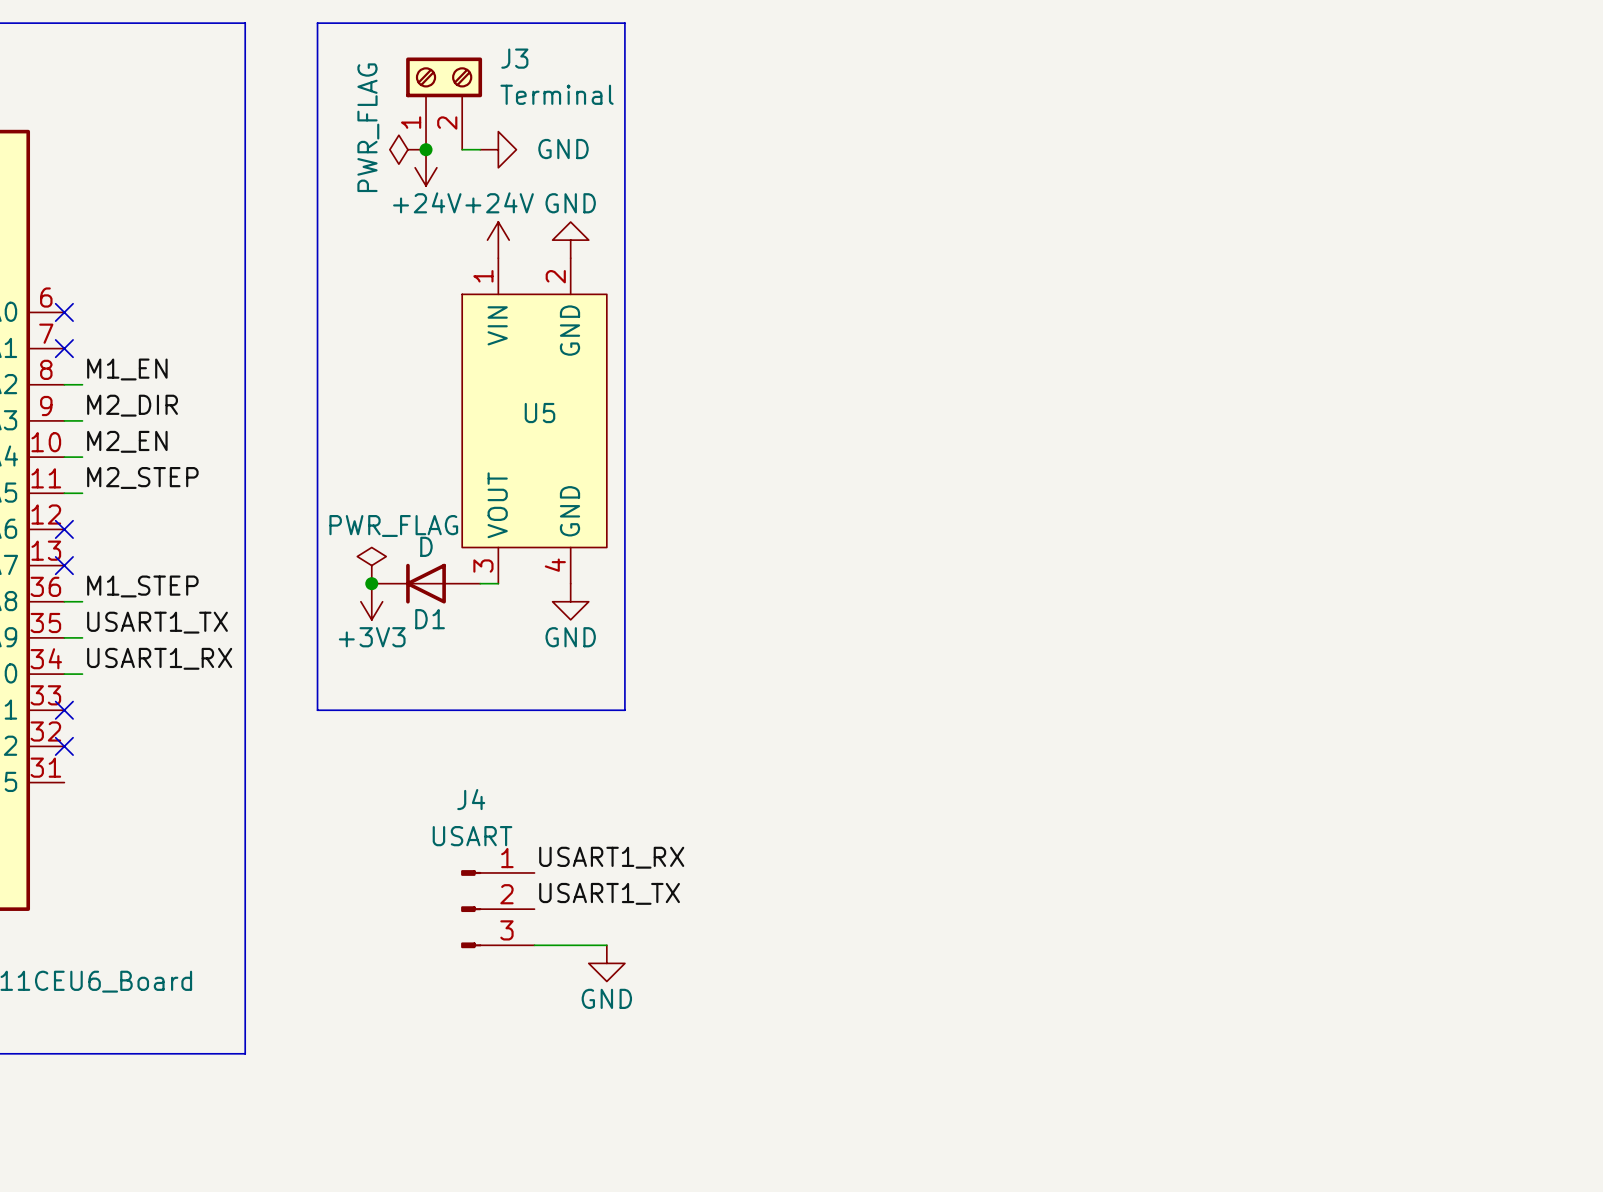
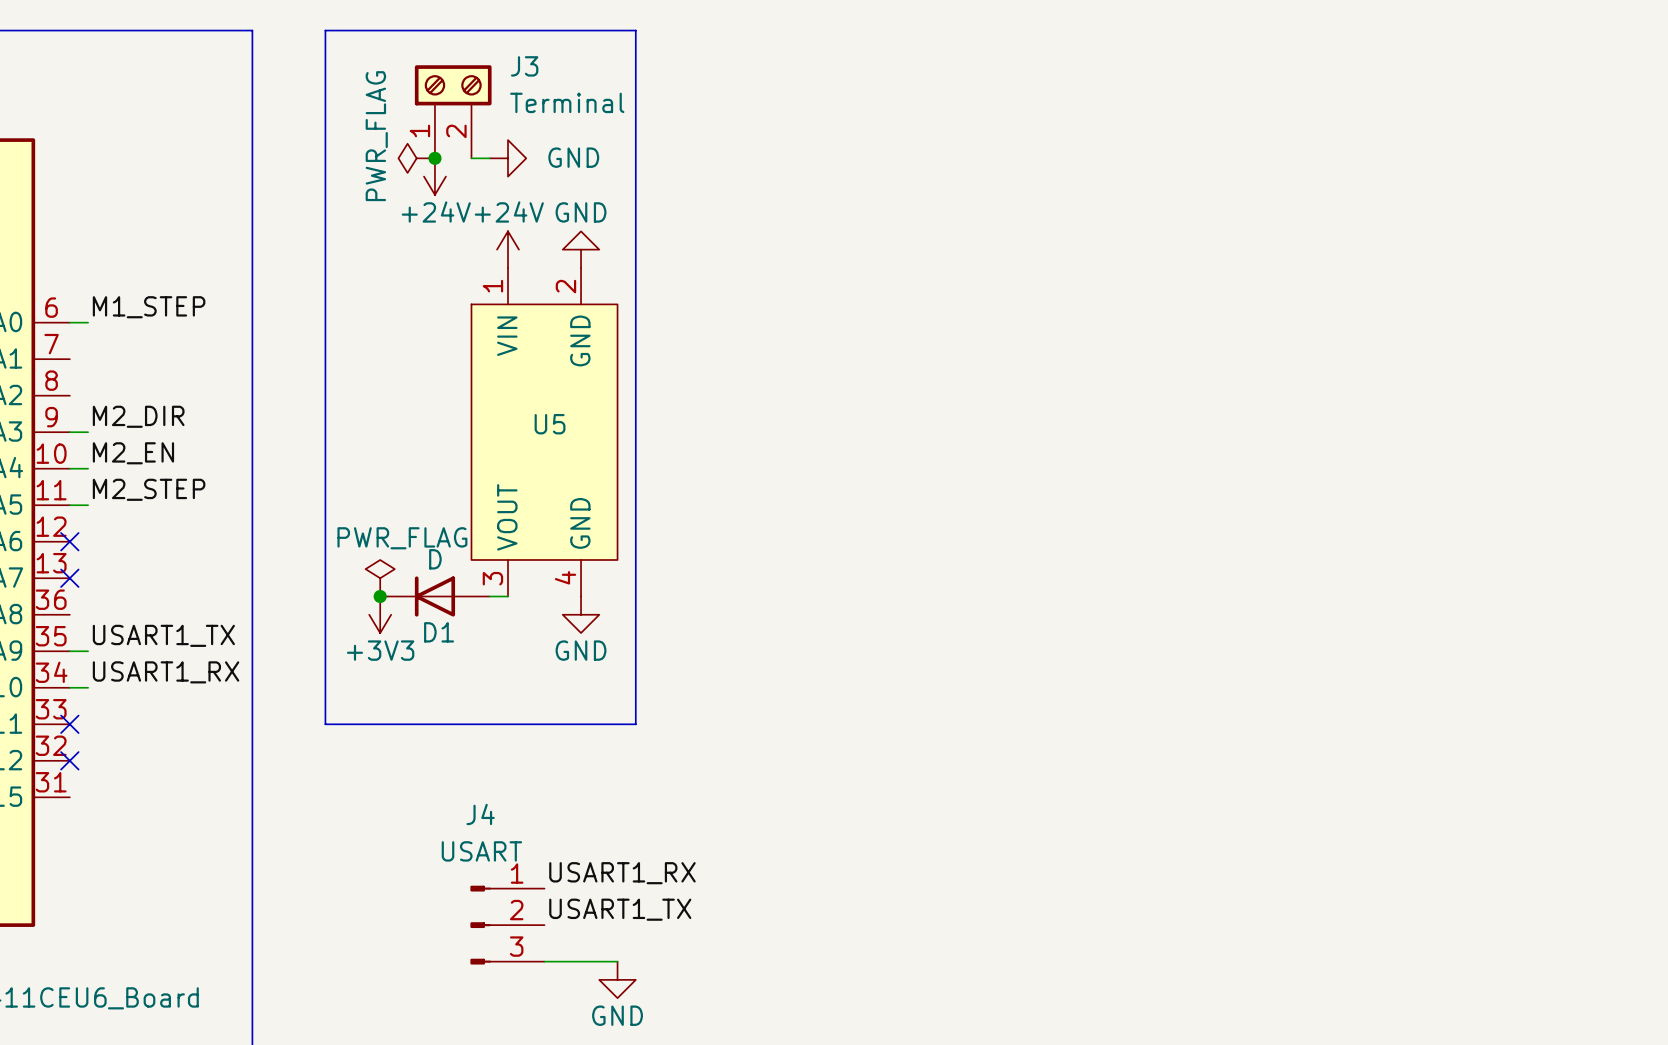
no-connect mark: (64, 312) -> none
no-connect mark: (64, 348) -> none
label: M1_EN (127, 369) -> none
wire: (64, 384) (82, 384) -> (69, 322) (88, 322)
label position: M1_STEP (142, 586) -> M1_STEP (149, 307)
wire: (64, 601) (82, 601) -> none

